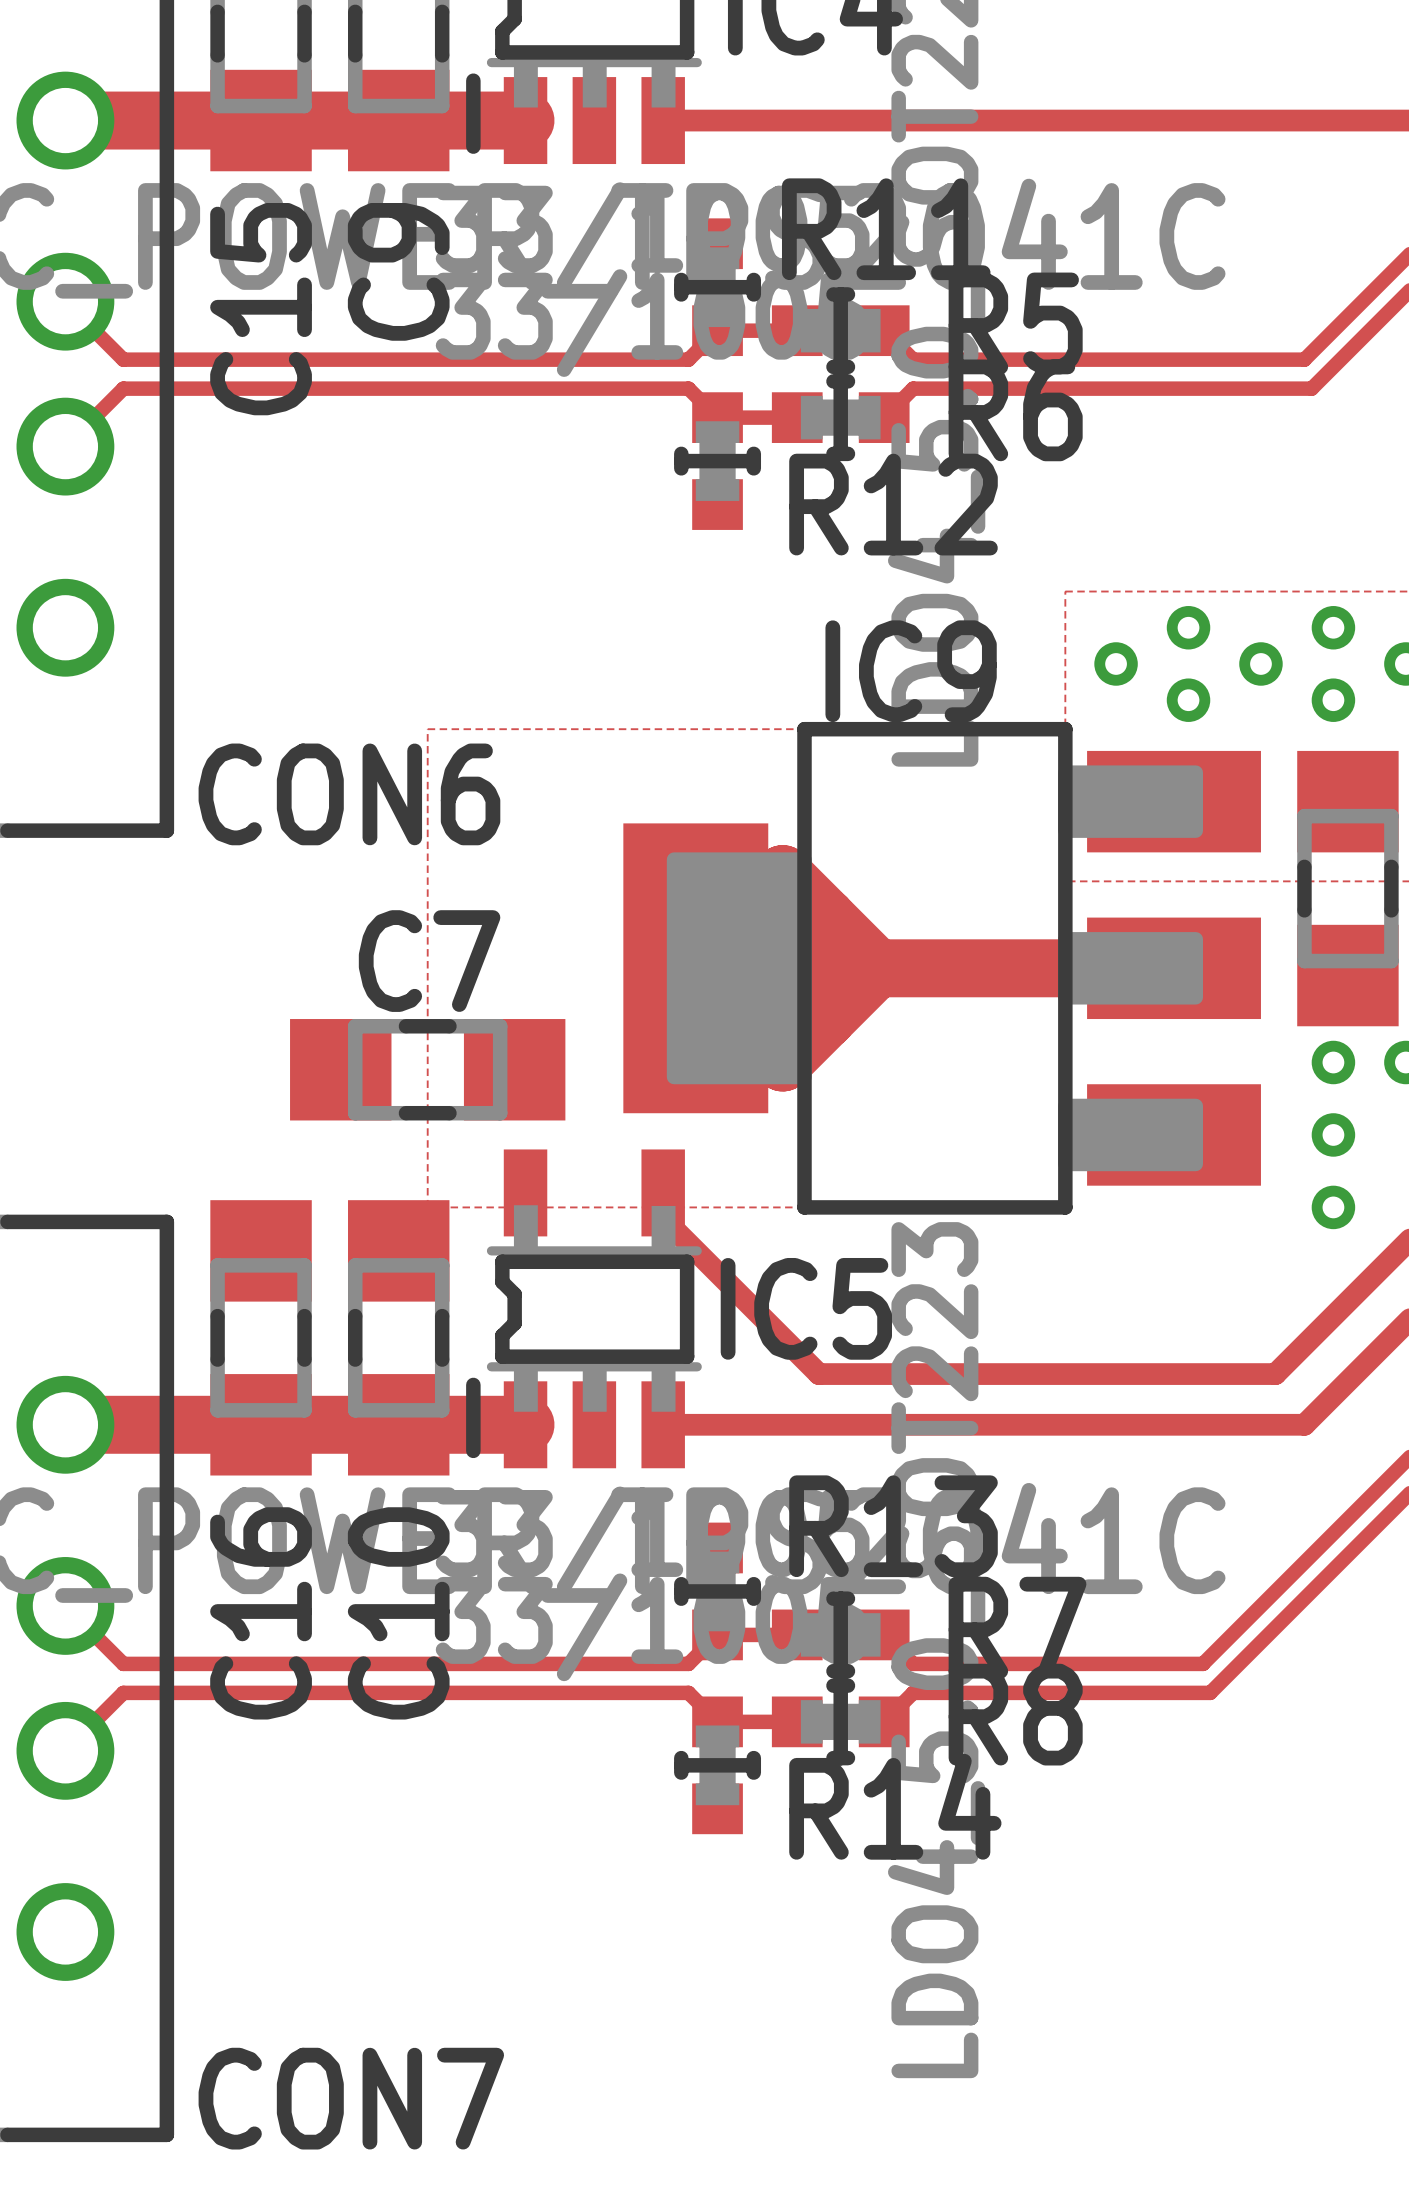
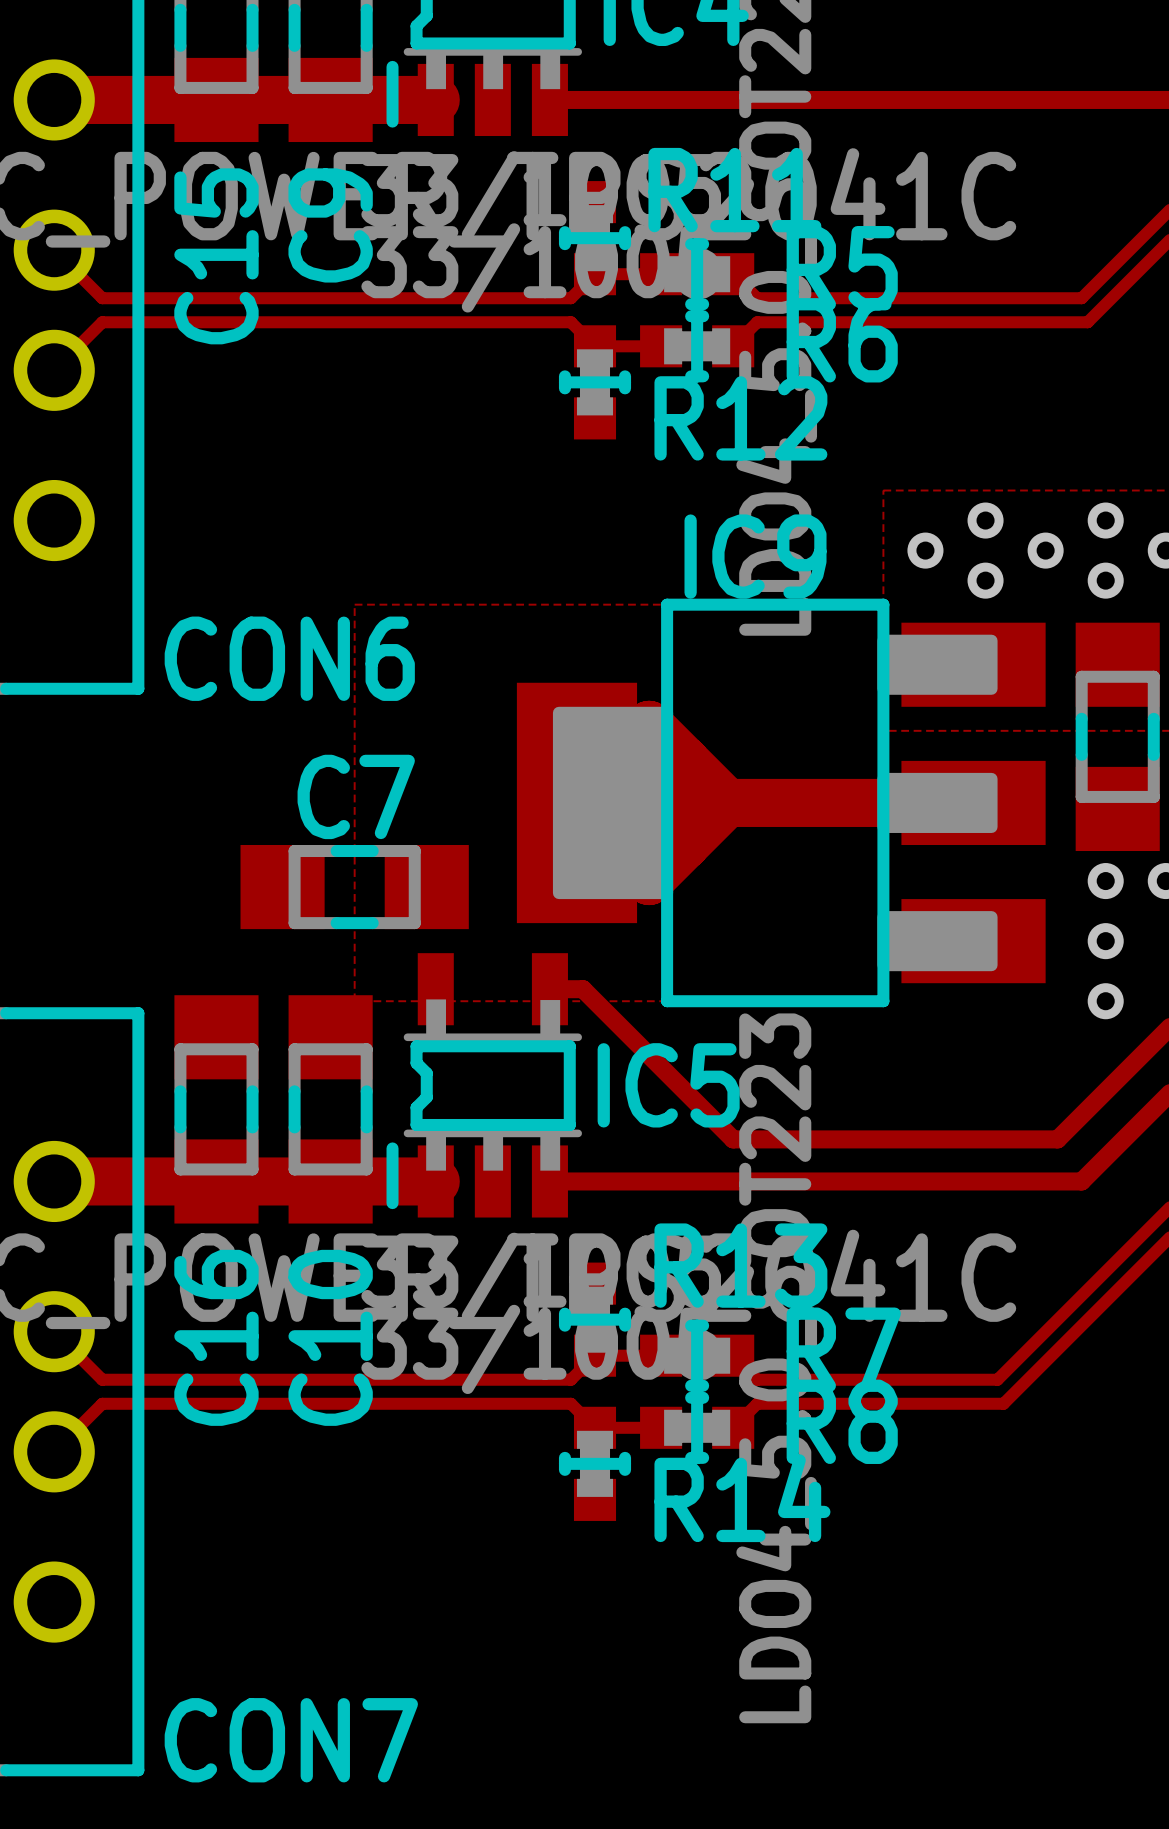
track: (663, 1192) (663, 1218) (818, 1374) (884, 1374) -> (549, 989) (582, 989) (733, 1139)

